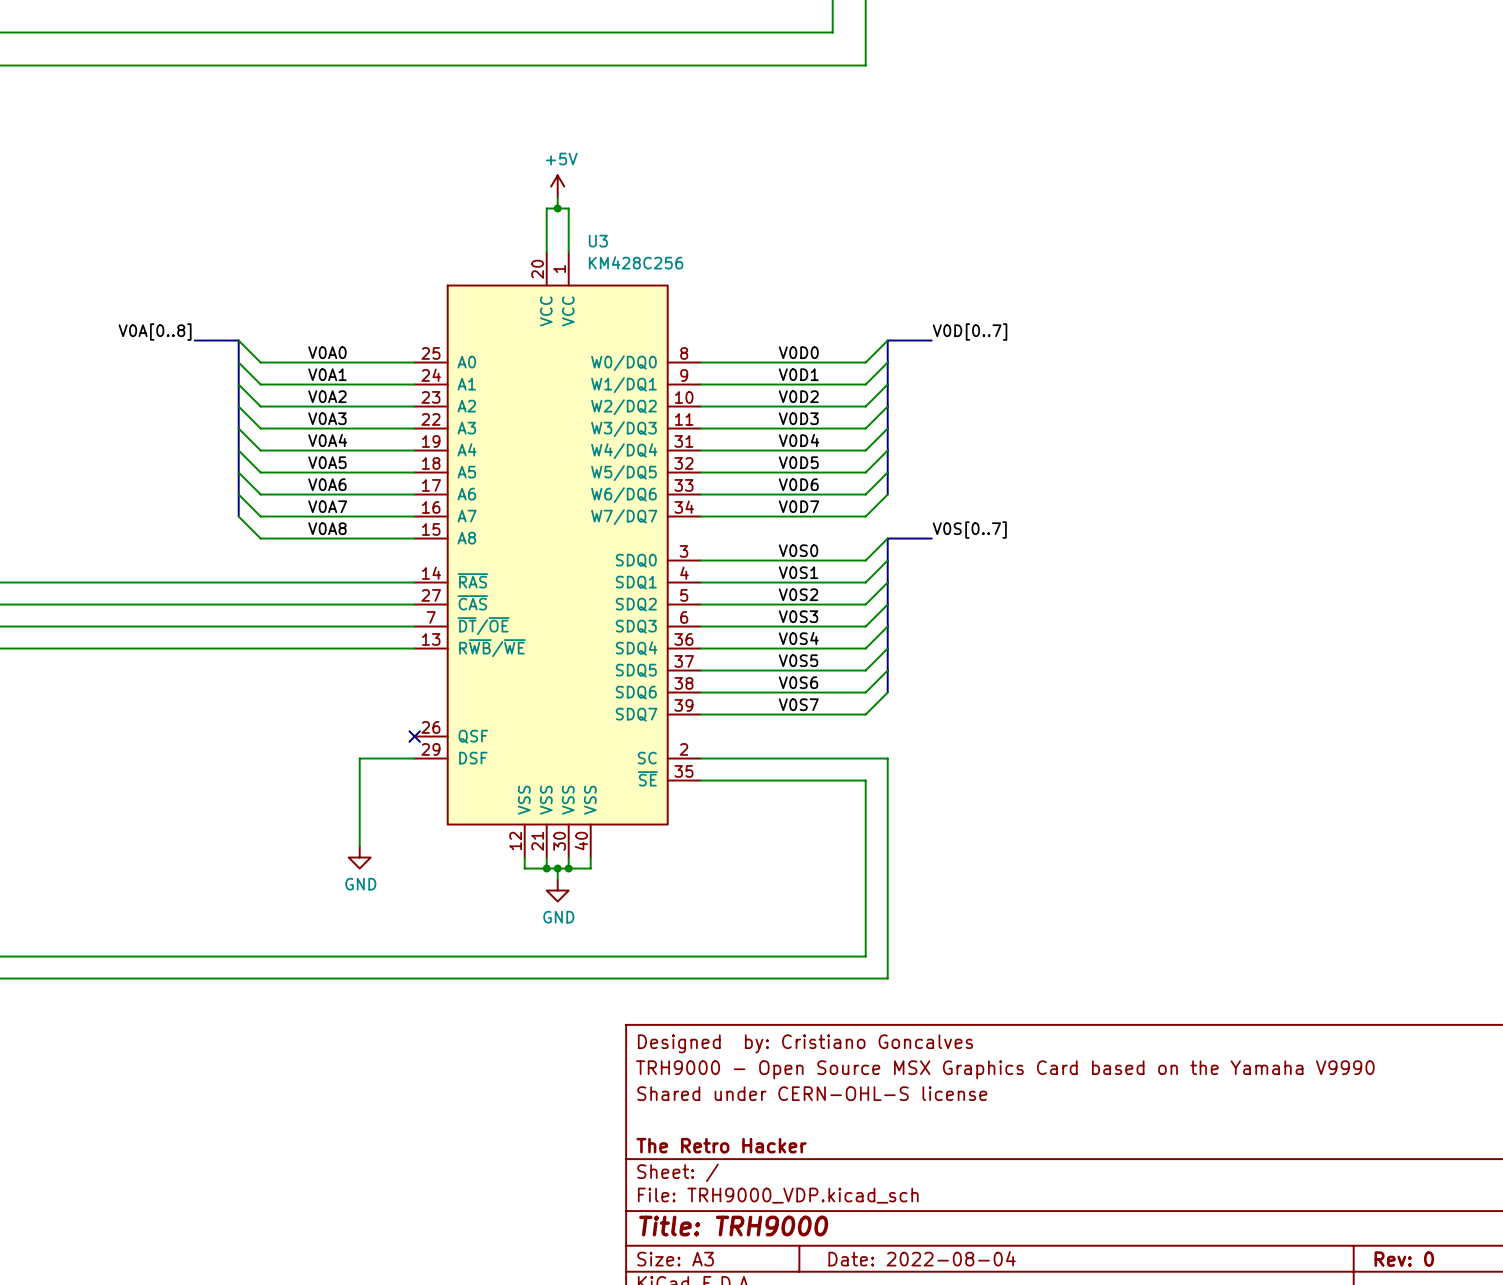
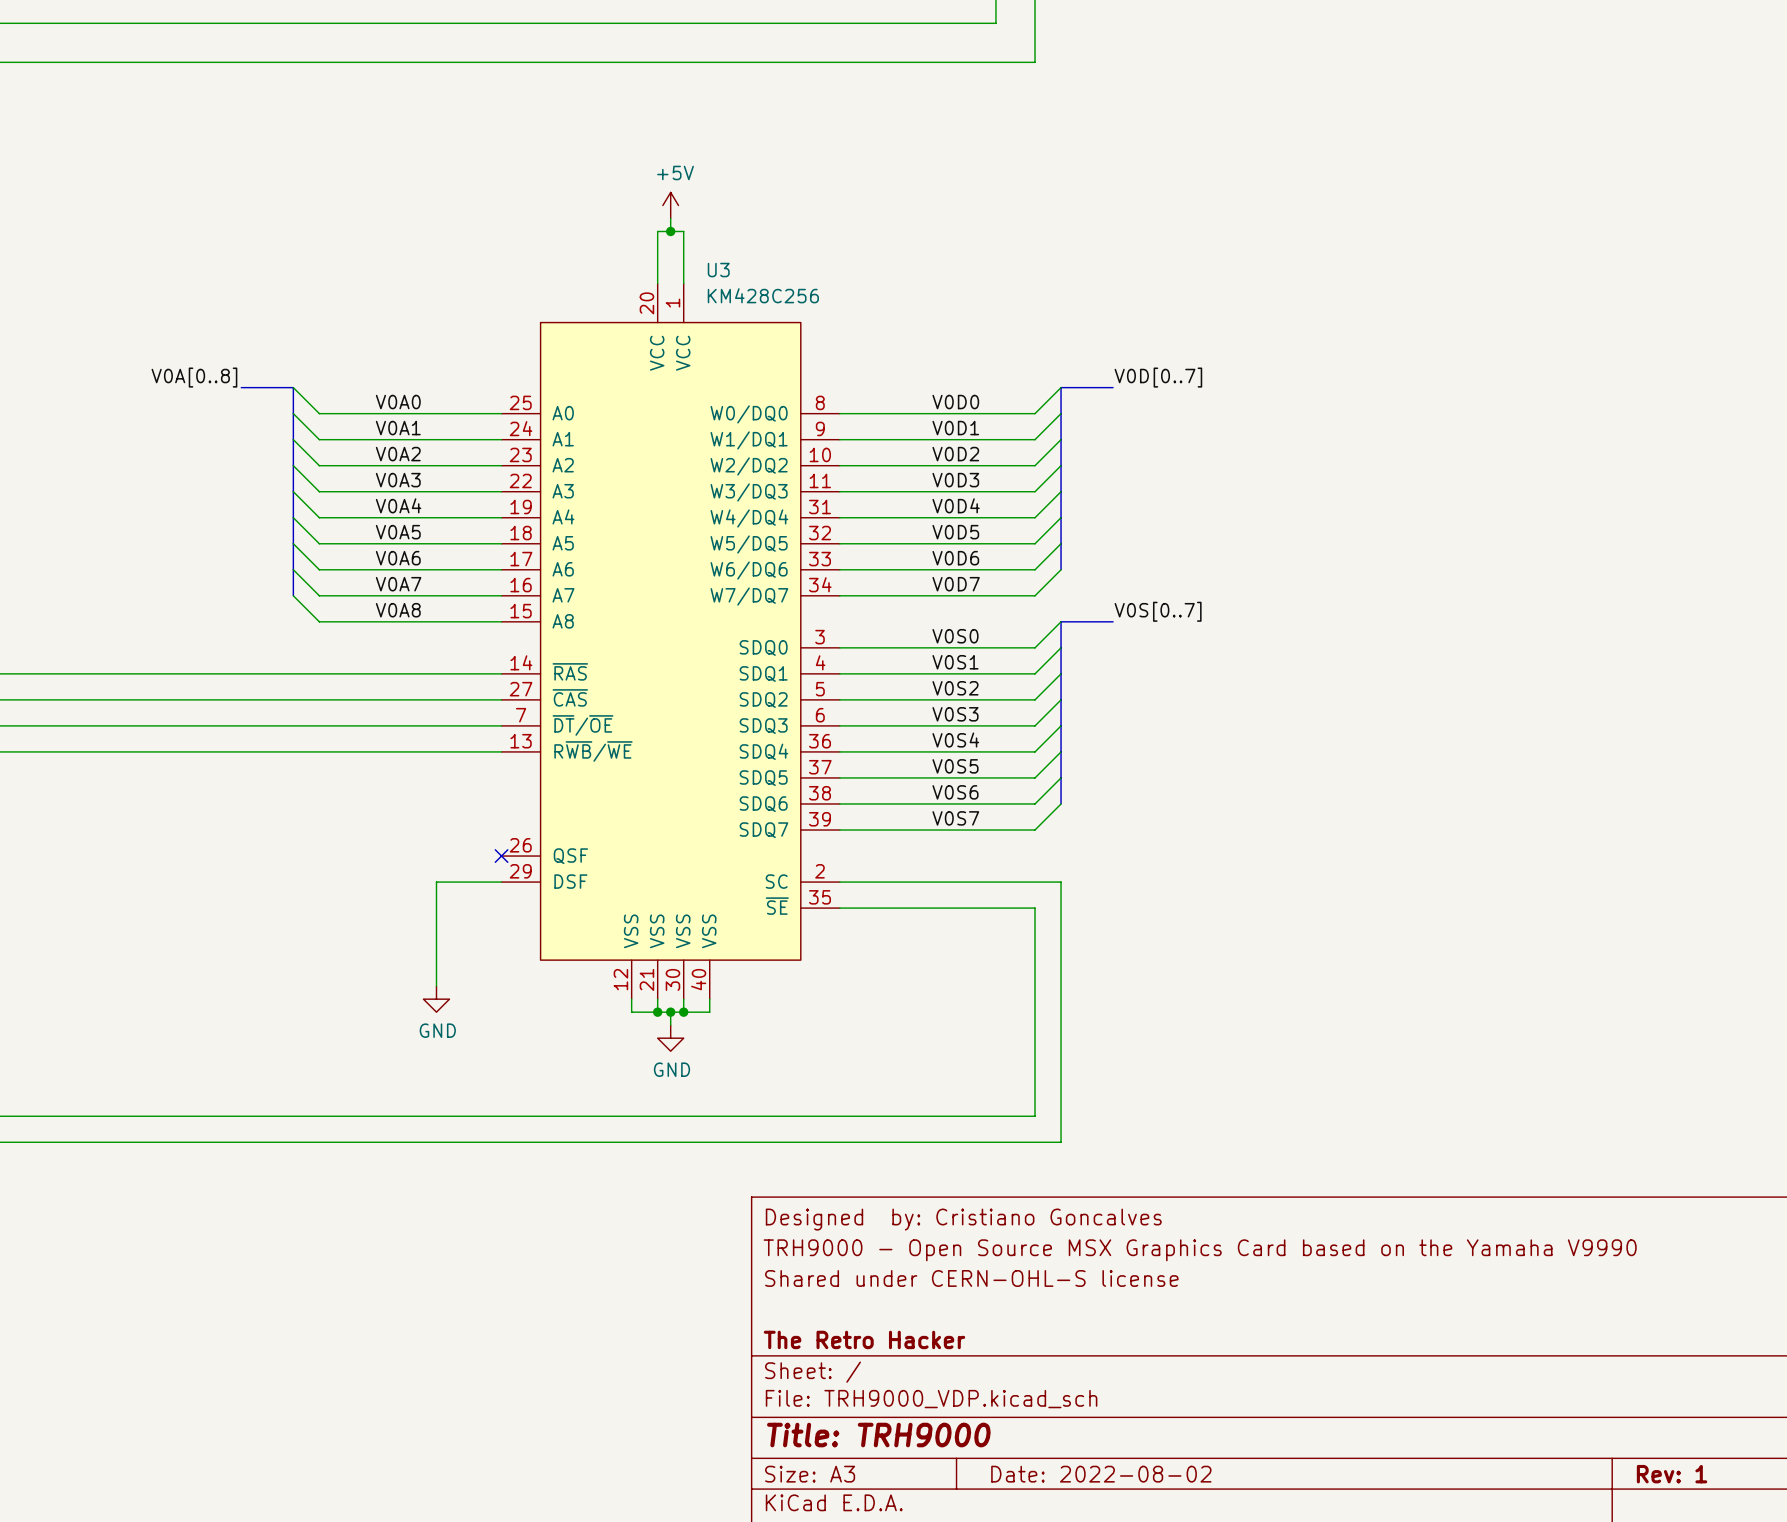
title block: Date: 2022-08-04 (922, 1258) -> Date: 2022-08-02 (1101, 1474)
title block: Rev: 0 (1404, 1259) -> Rev: 1 (1672, 1474)

